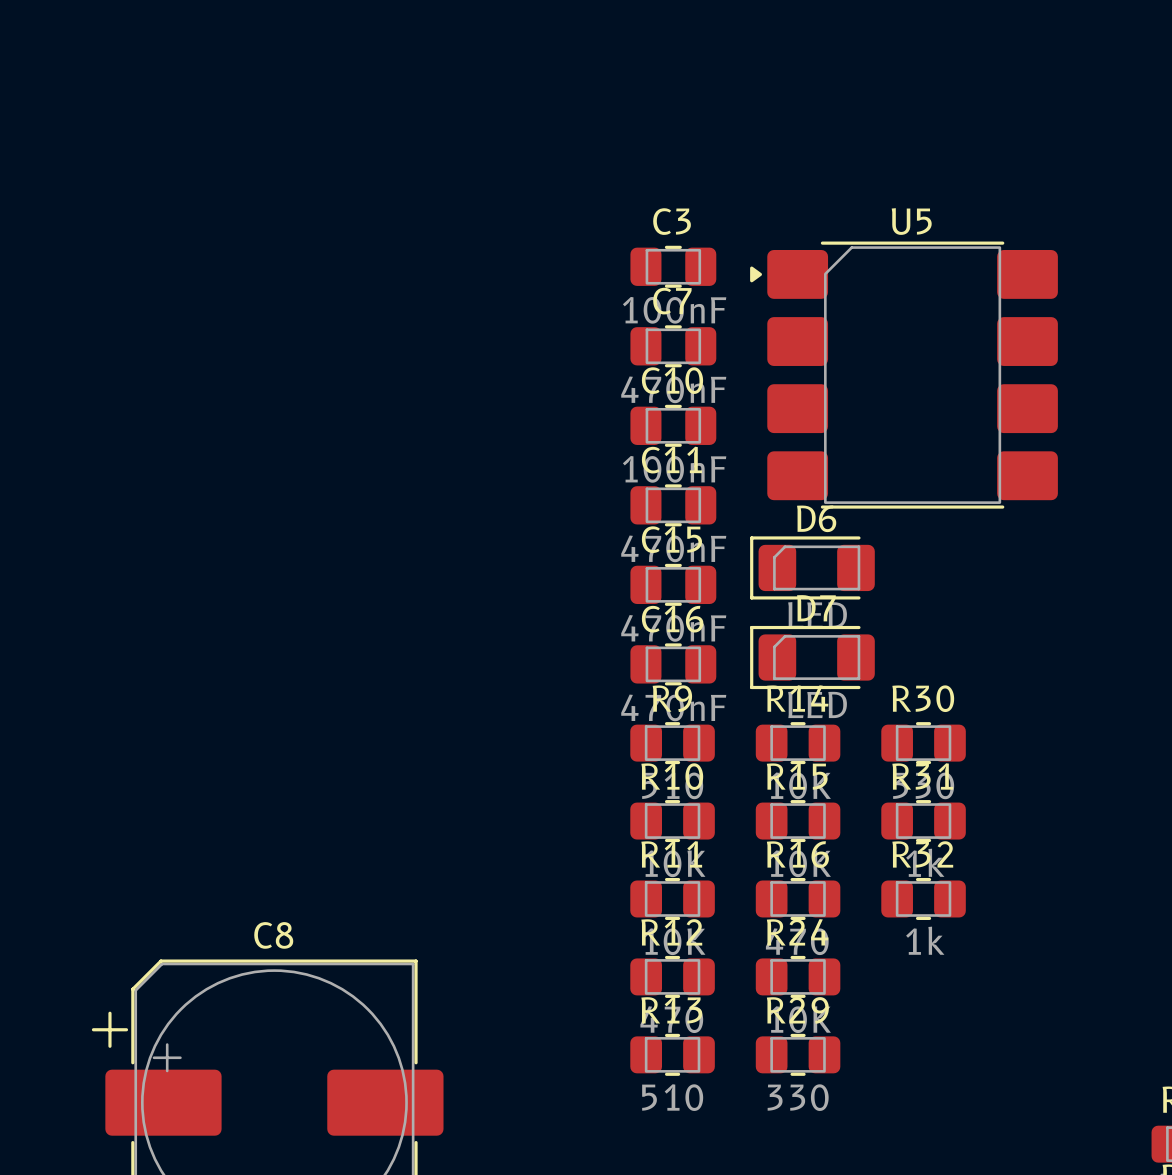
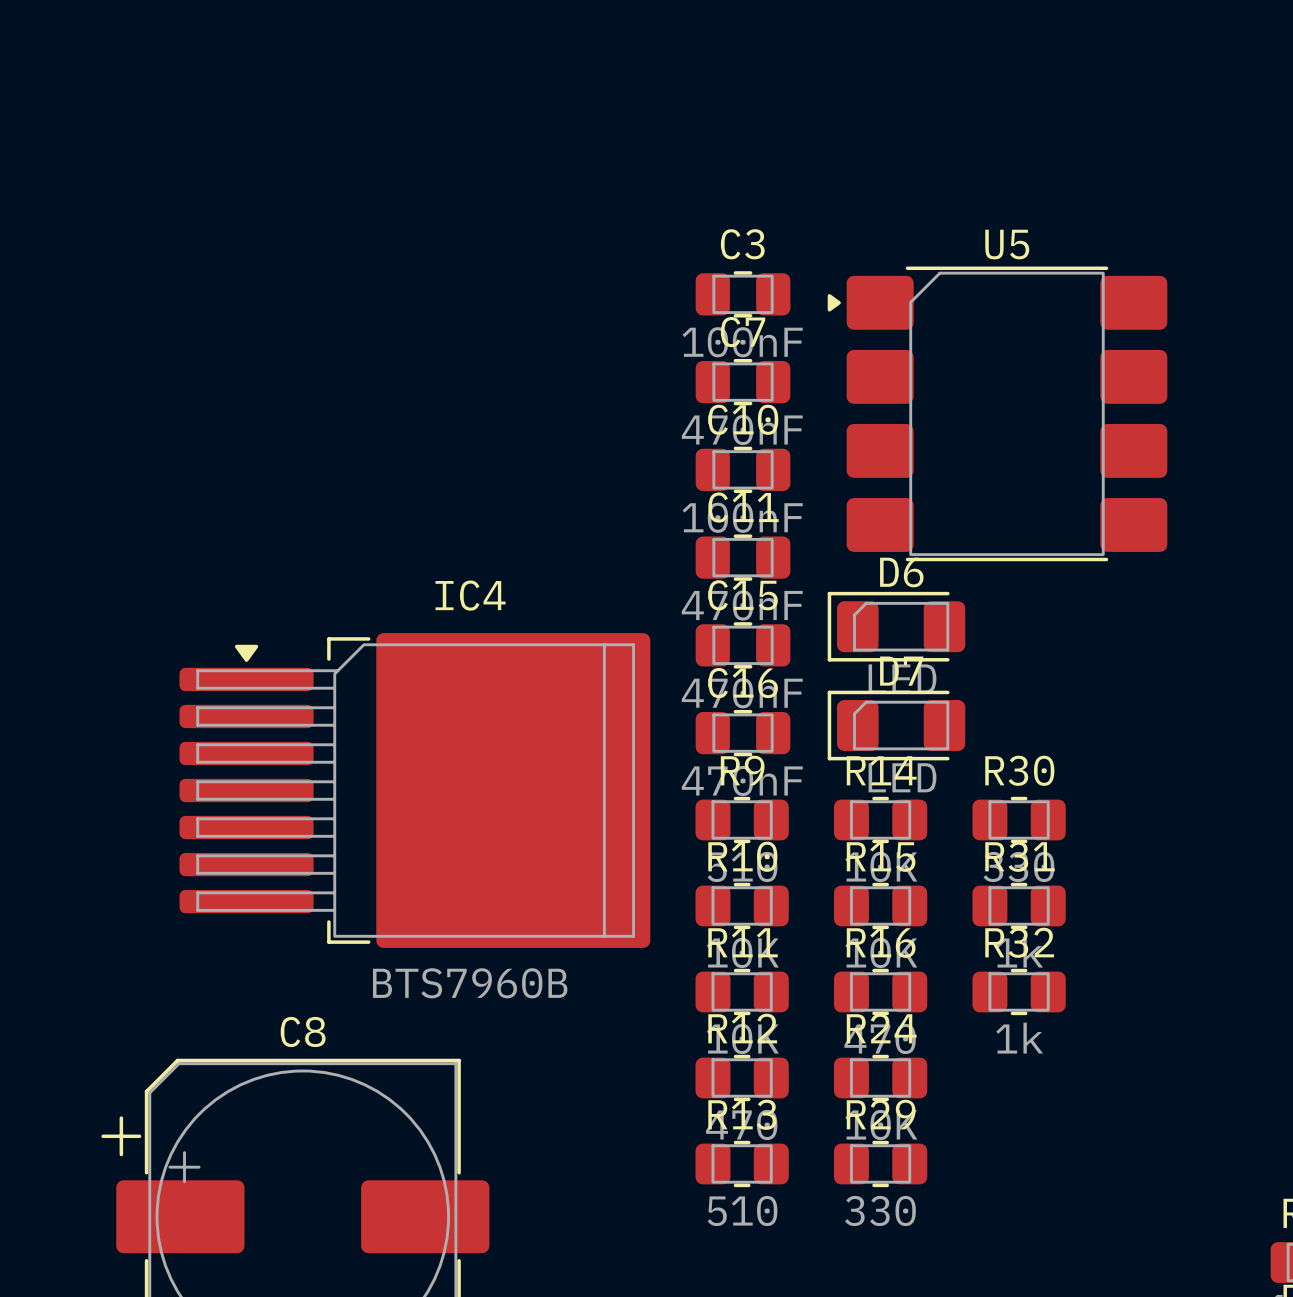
IC4: none -> BTS7960B (414, 790)

